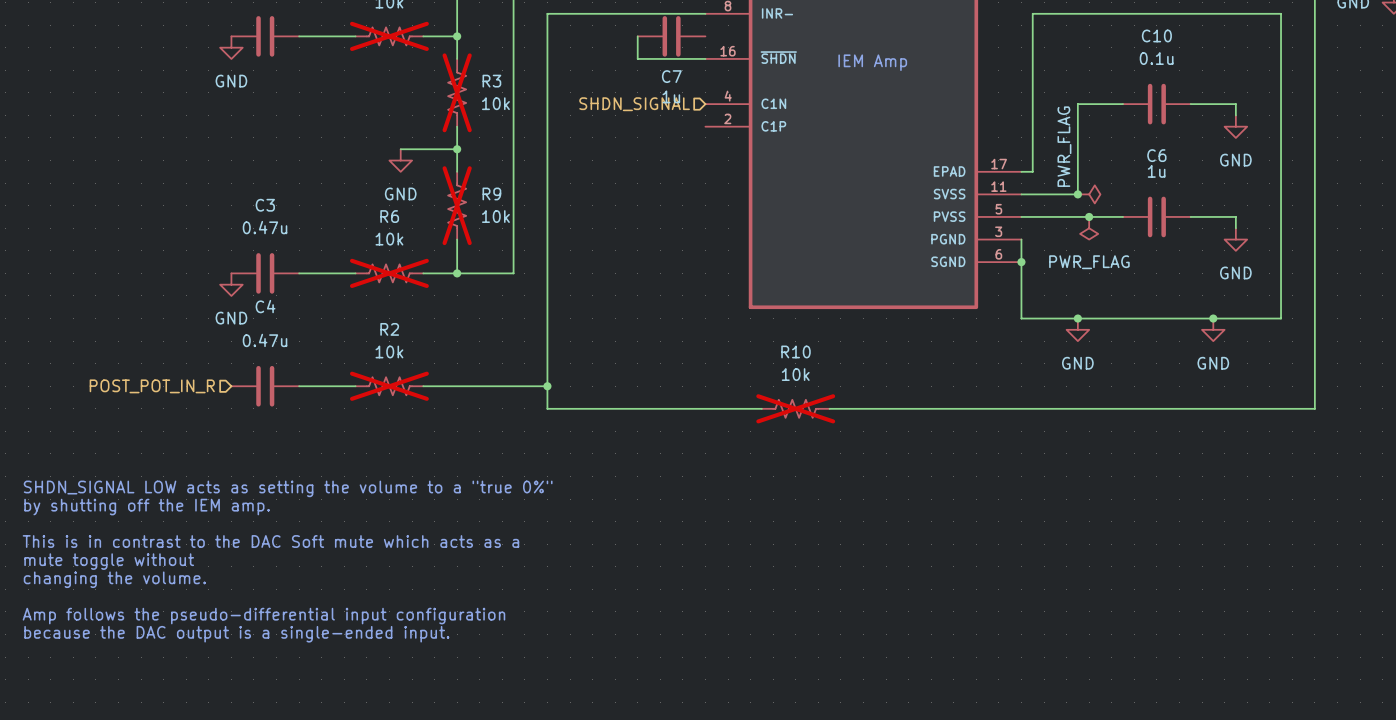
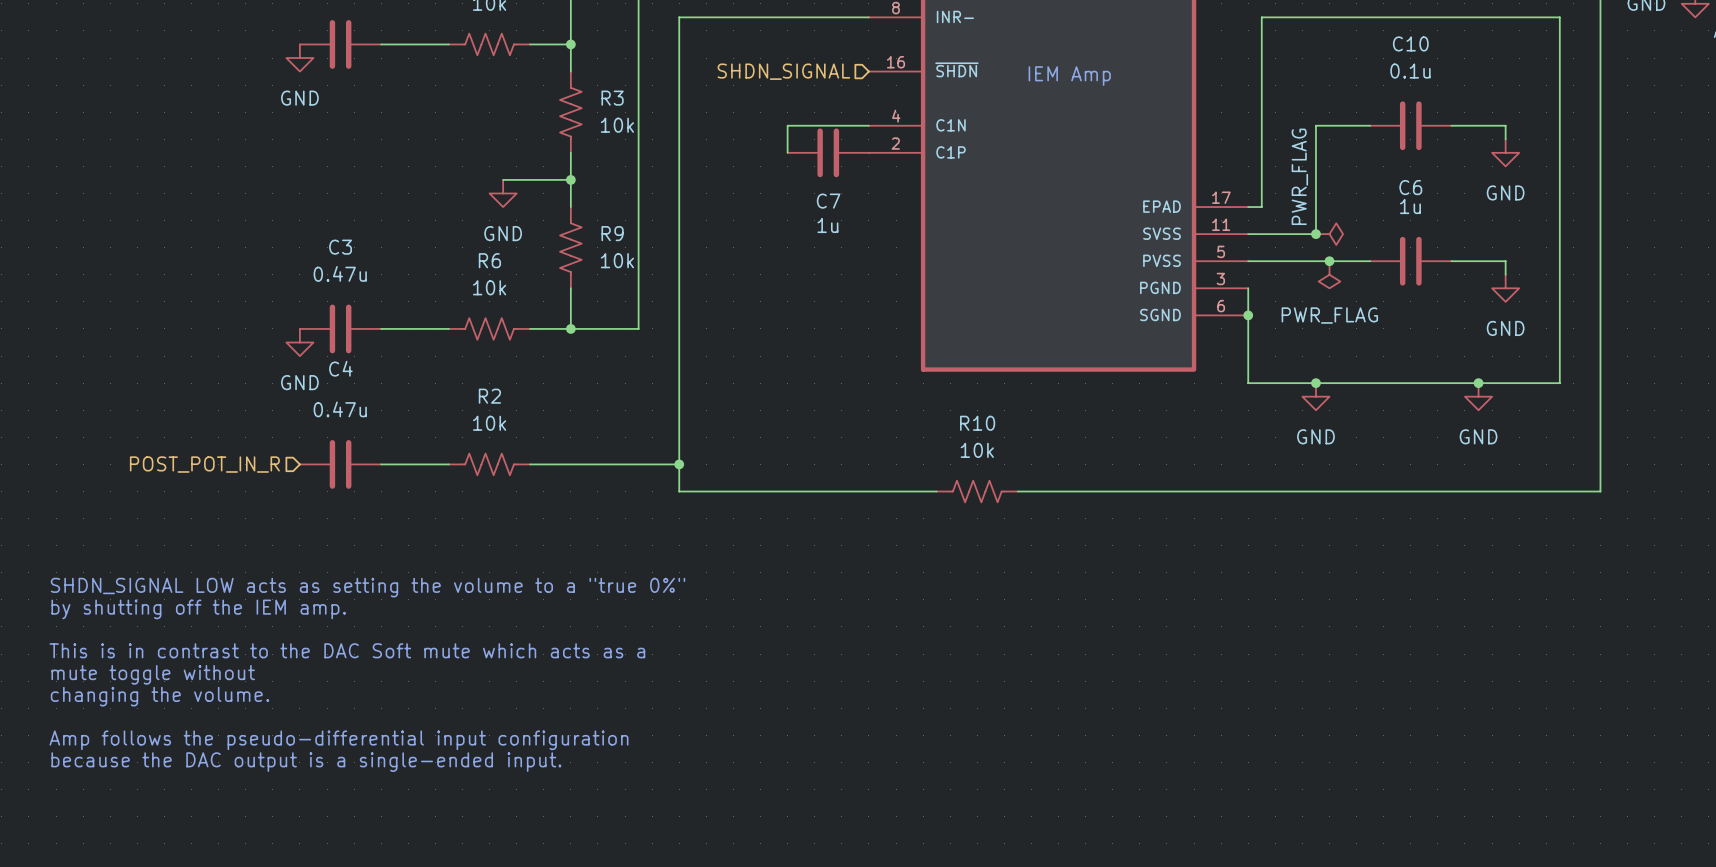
part do-not-place cross: (389, 36) -> none
wire: (637, 36) (637, 58) (705, 58) -> none
C7 position: (671, 36) -> (828, 152)
R3 do-not-place cross: (457, 92) -> none
hierarchical label position: SHDN_SIGNAL (634, 104) -> SHDN_SIGNAL (783, 71)
wire: none -> (868, 125) (787, 125) (787, 152)
R9 do-not-place cross: (457, 205) -> none
R6 do-not-place cross: (389, 273) -> none
R2 do-not-place cross: (389, 386) -> none
R10 do-not-place cross: (795, 408) -> none

